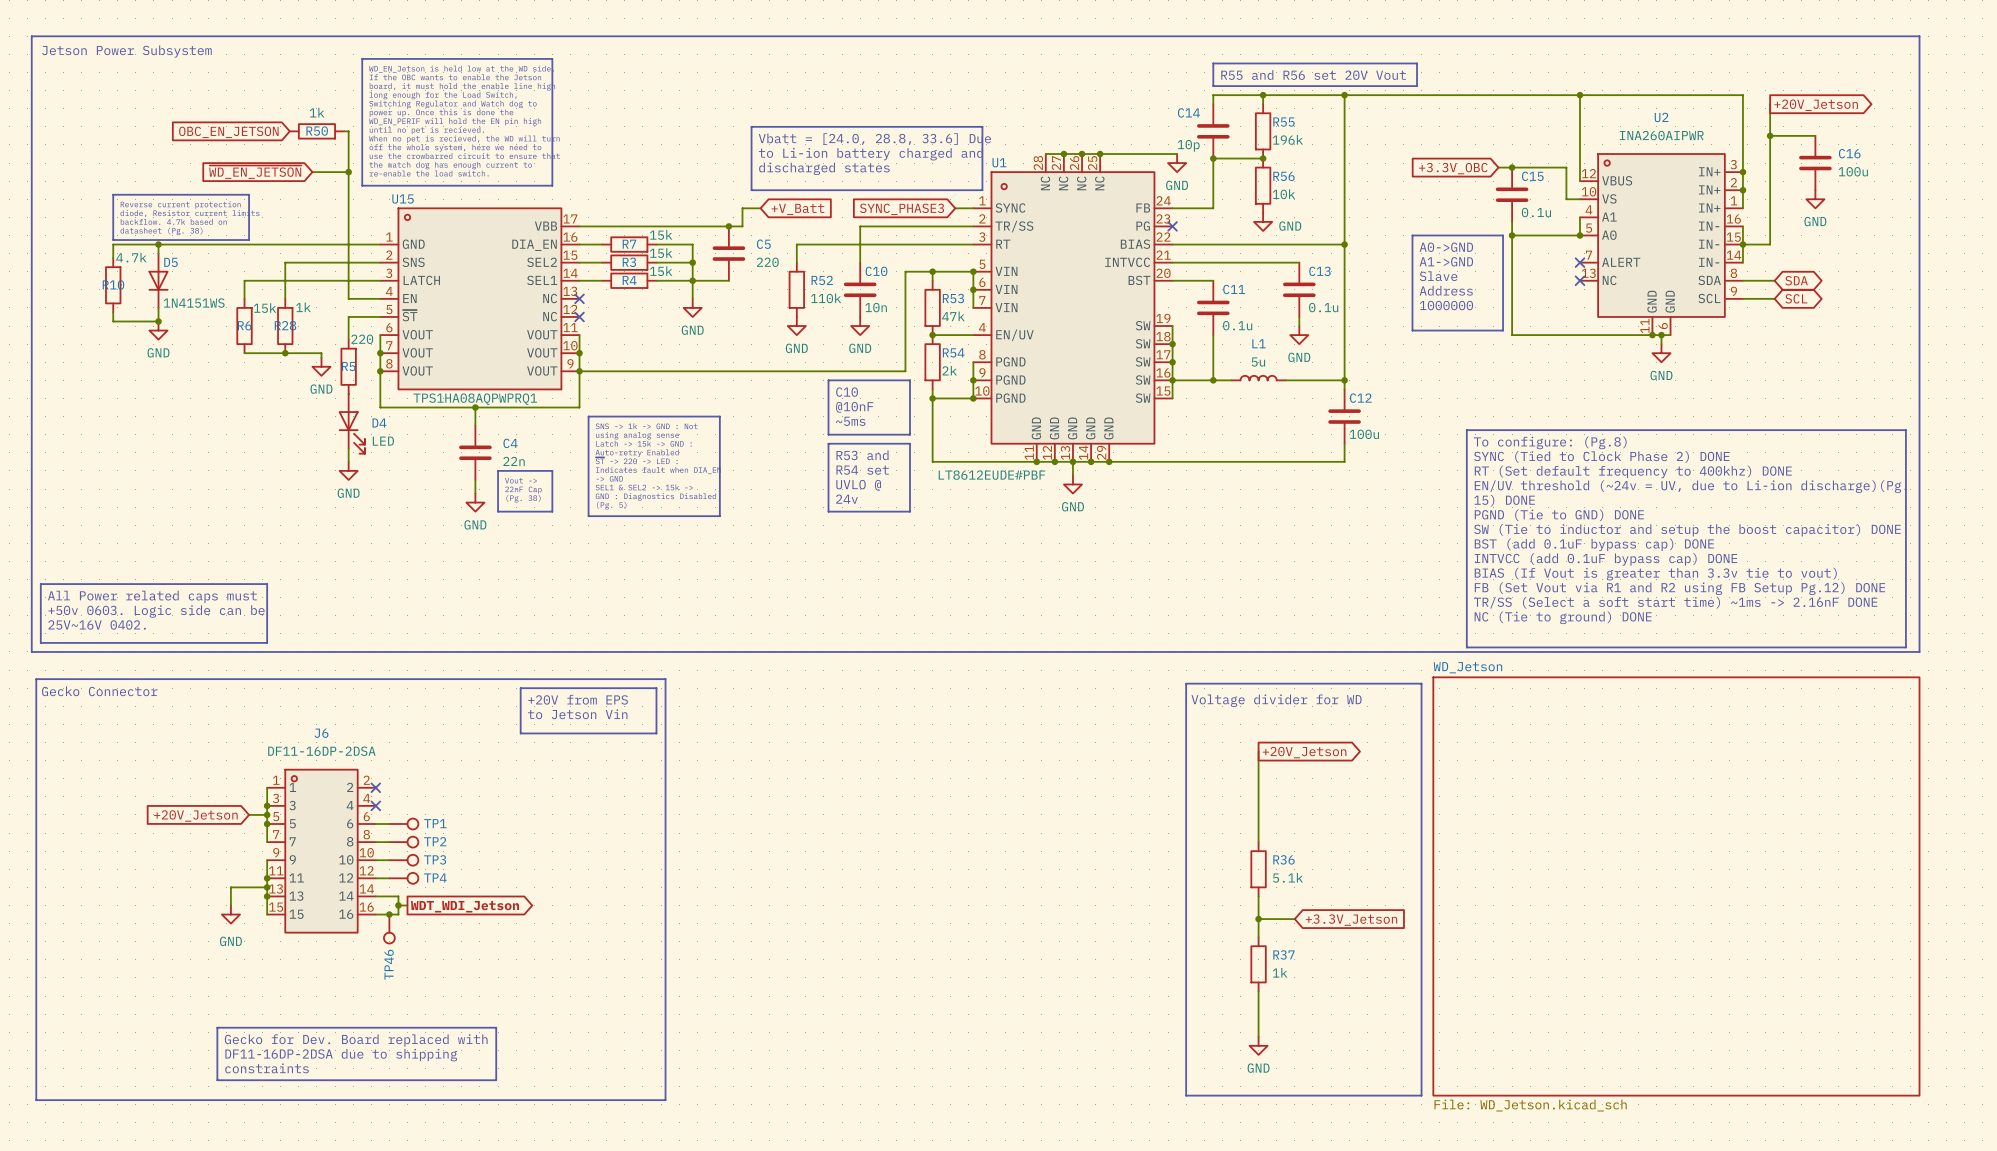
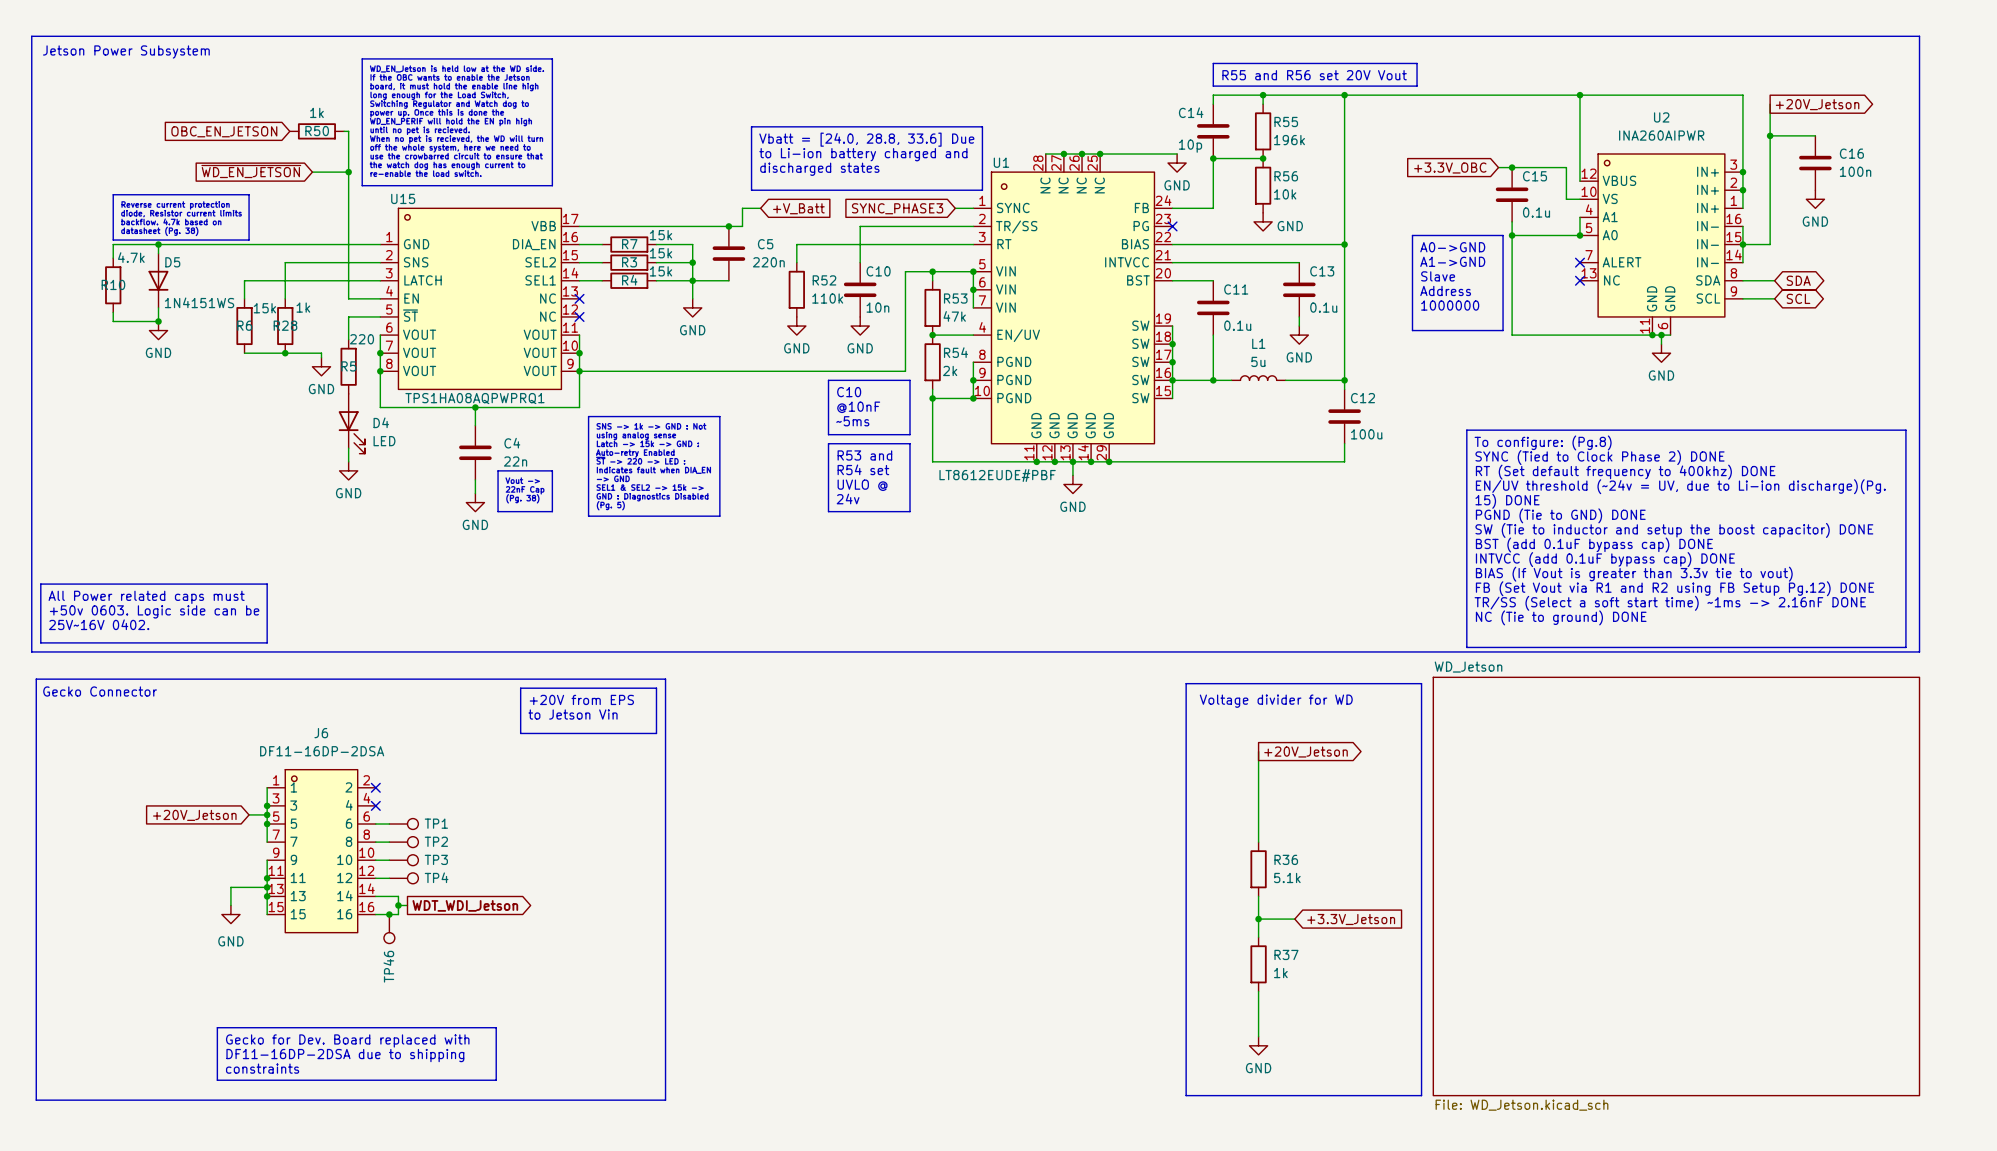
C16 value: 100u (1853, 171) -> 100n (1855, 171)
C5 value: 220 (767, 262) -> 220n (768, 262)

